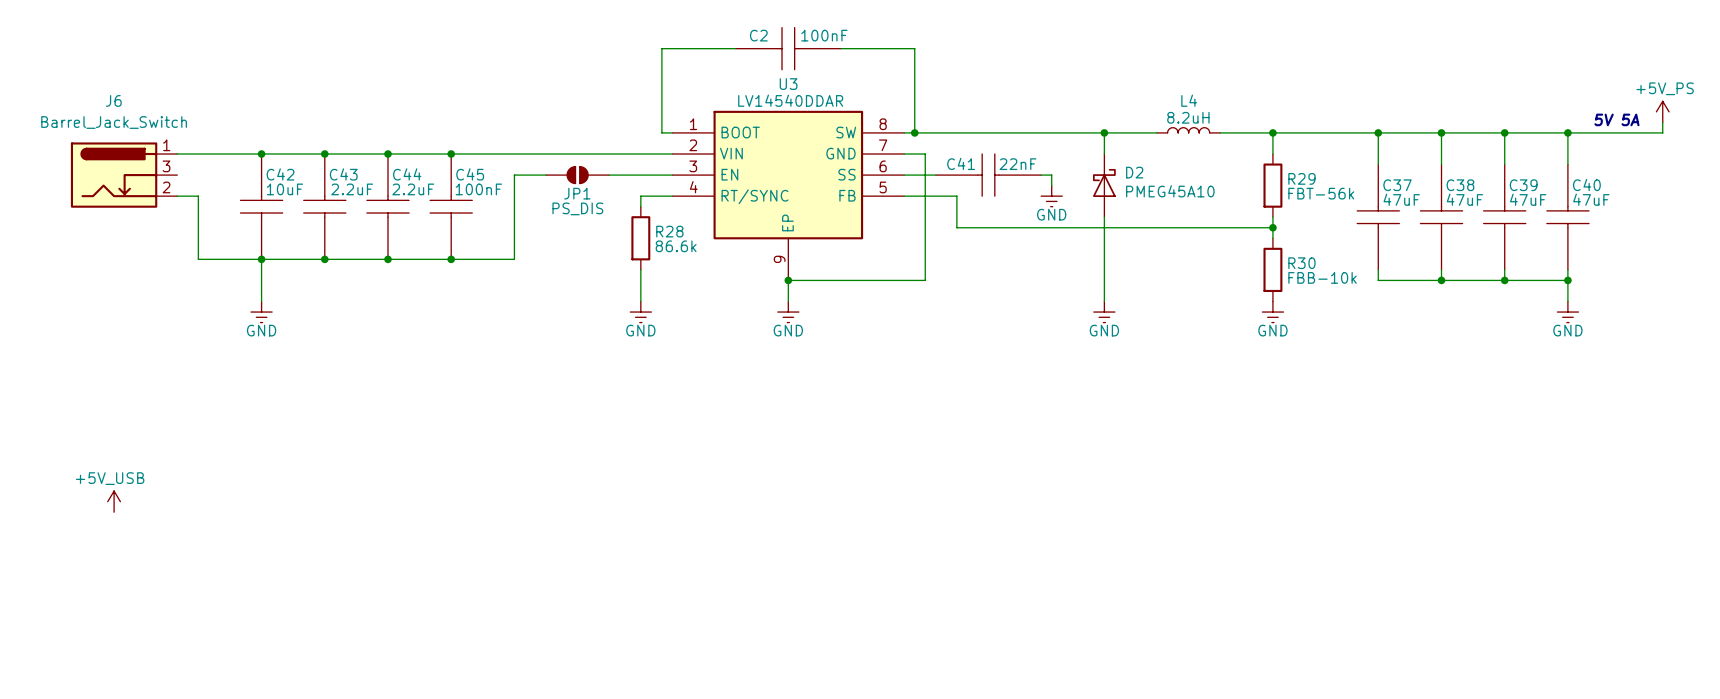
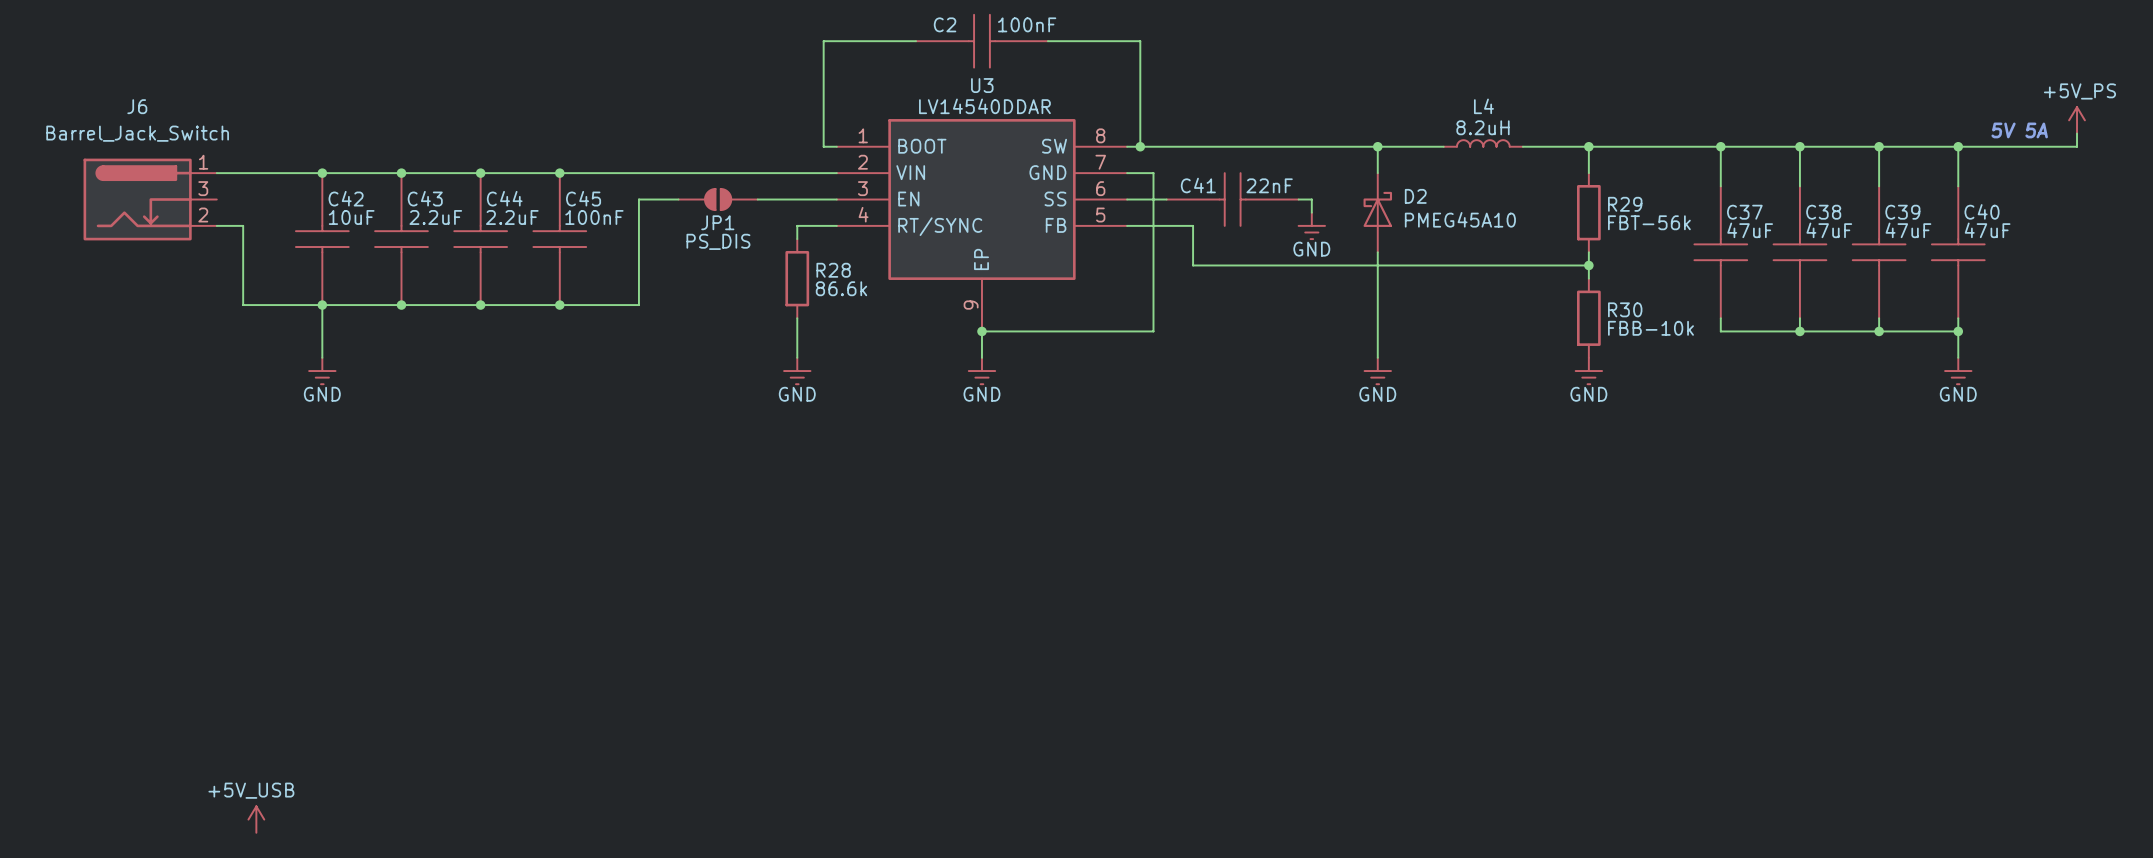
power symbol position: +5V_USB (114, 501) -> +5V_USB (256, 819)

